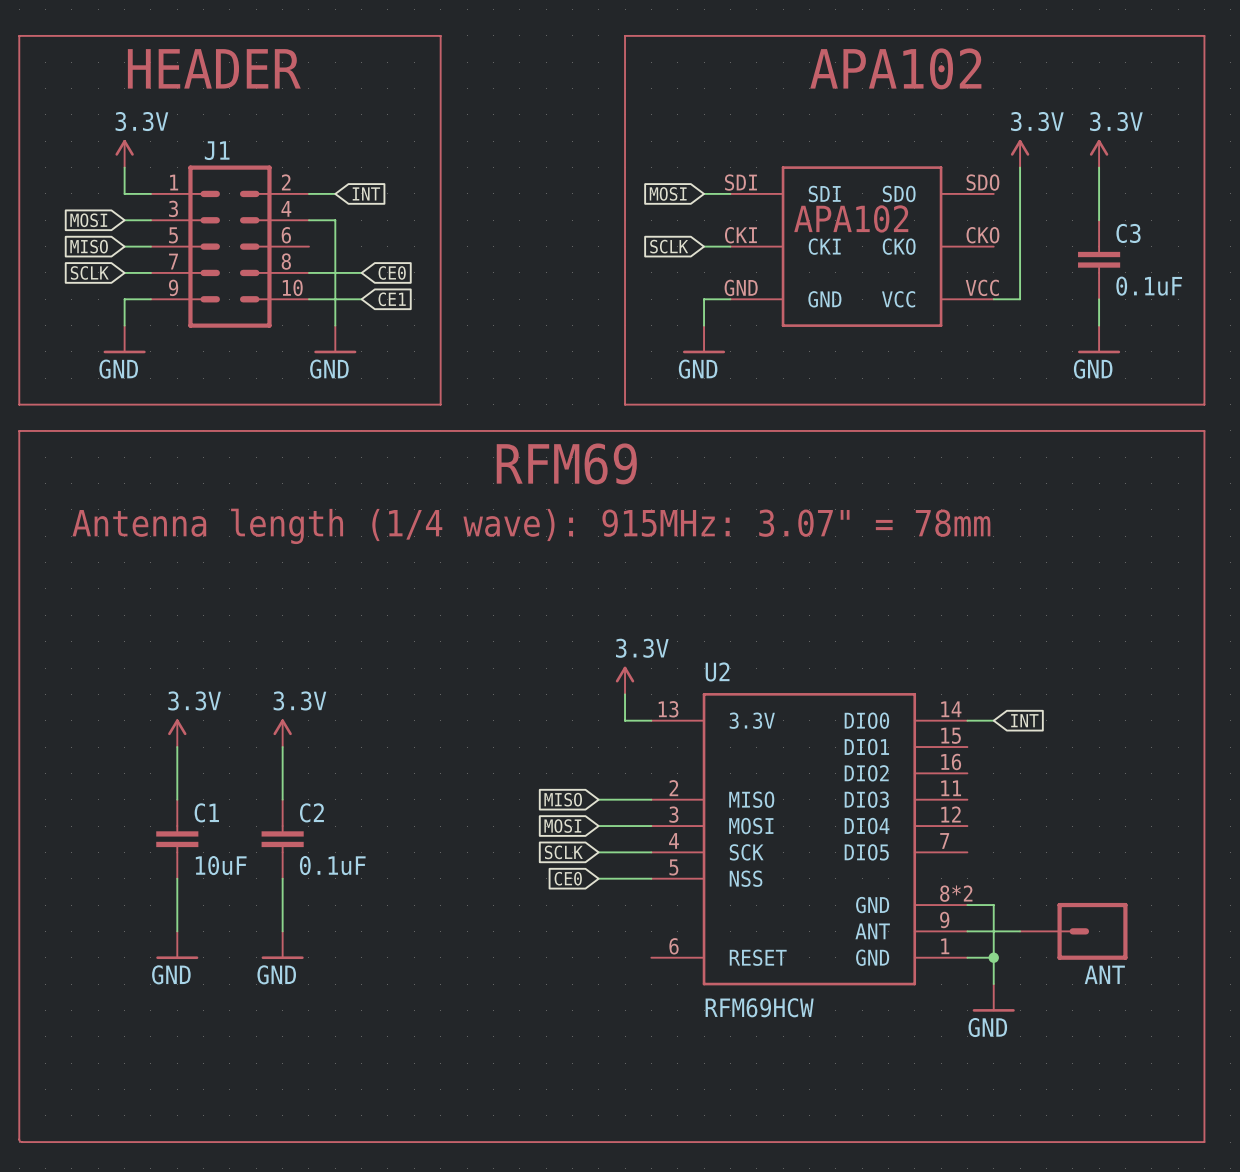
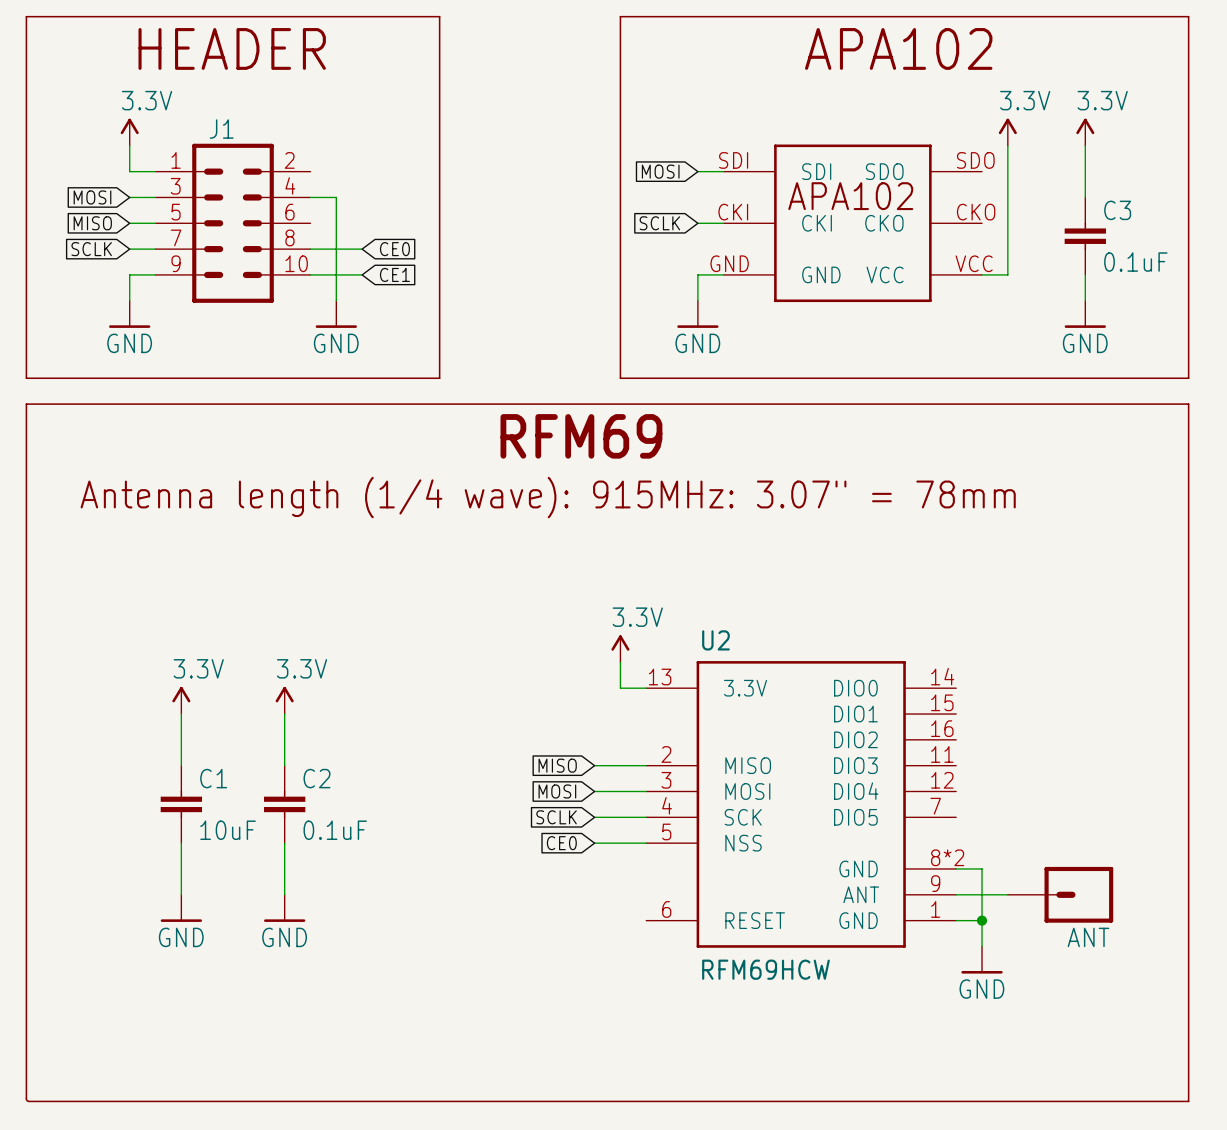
wire: (308, 193) (335, 193) -> none
global label: INT (366, 193) -> none
wire: (967, 720) (993, 720) -> none
global label: INT (1024, 720) -> none

